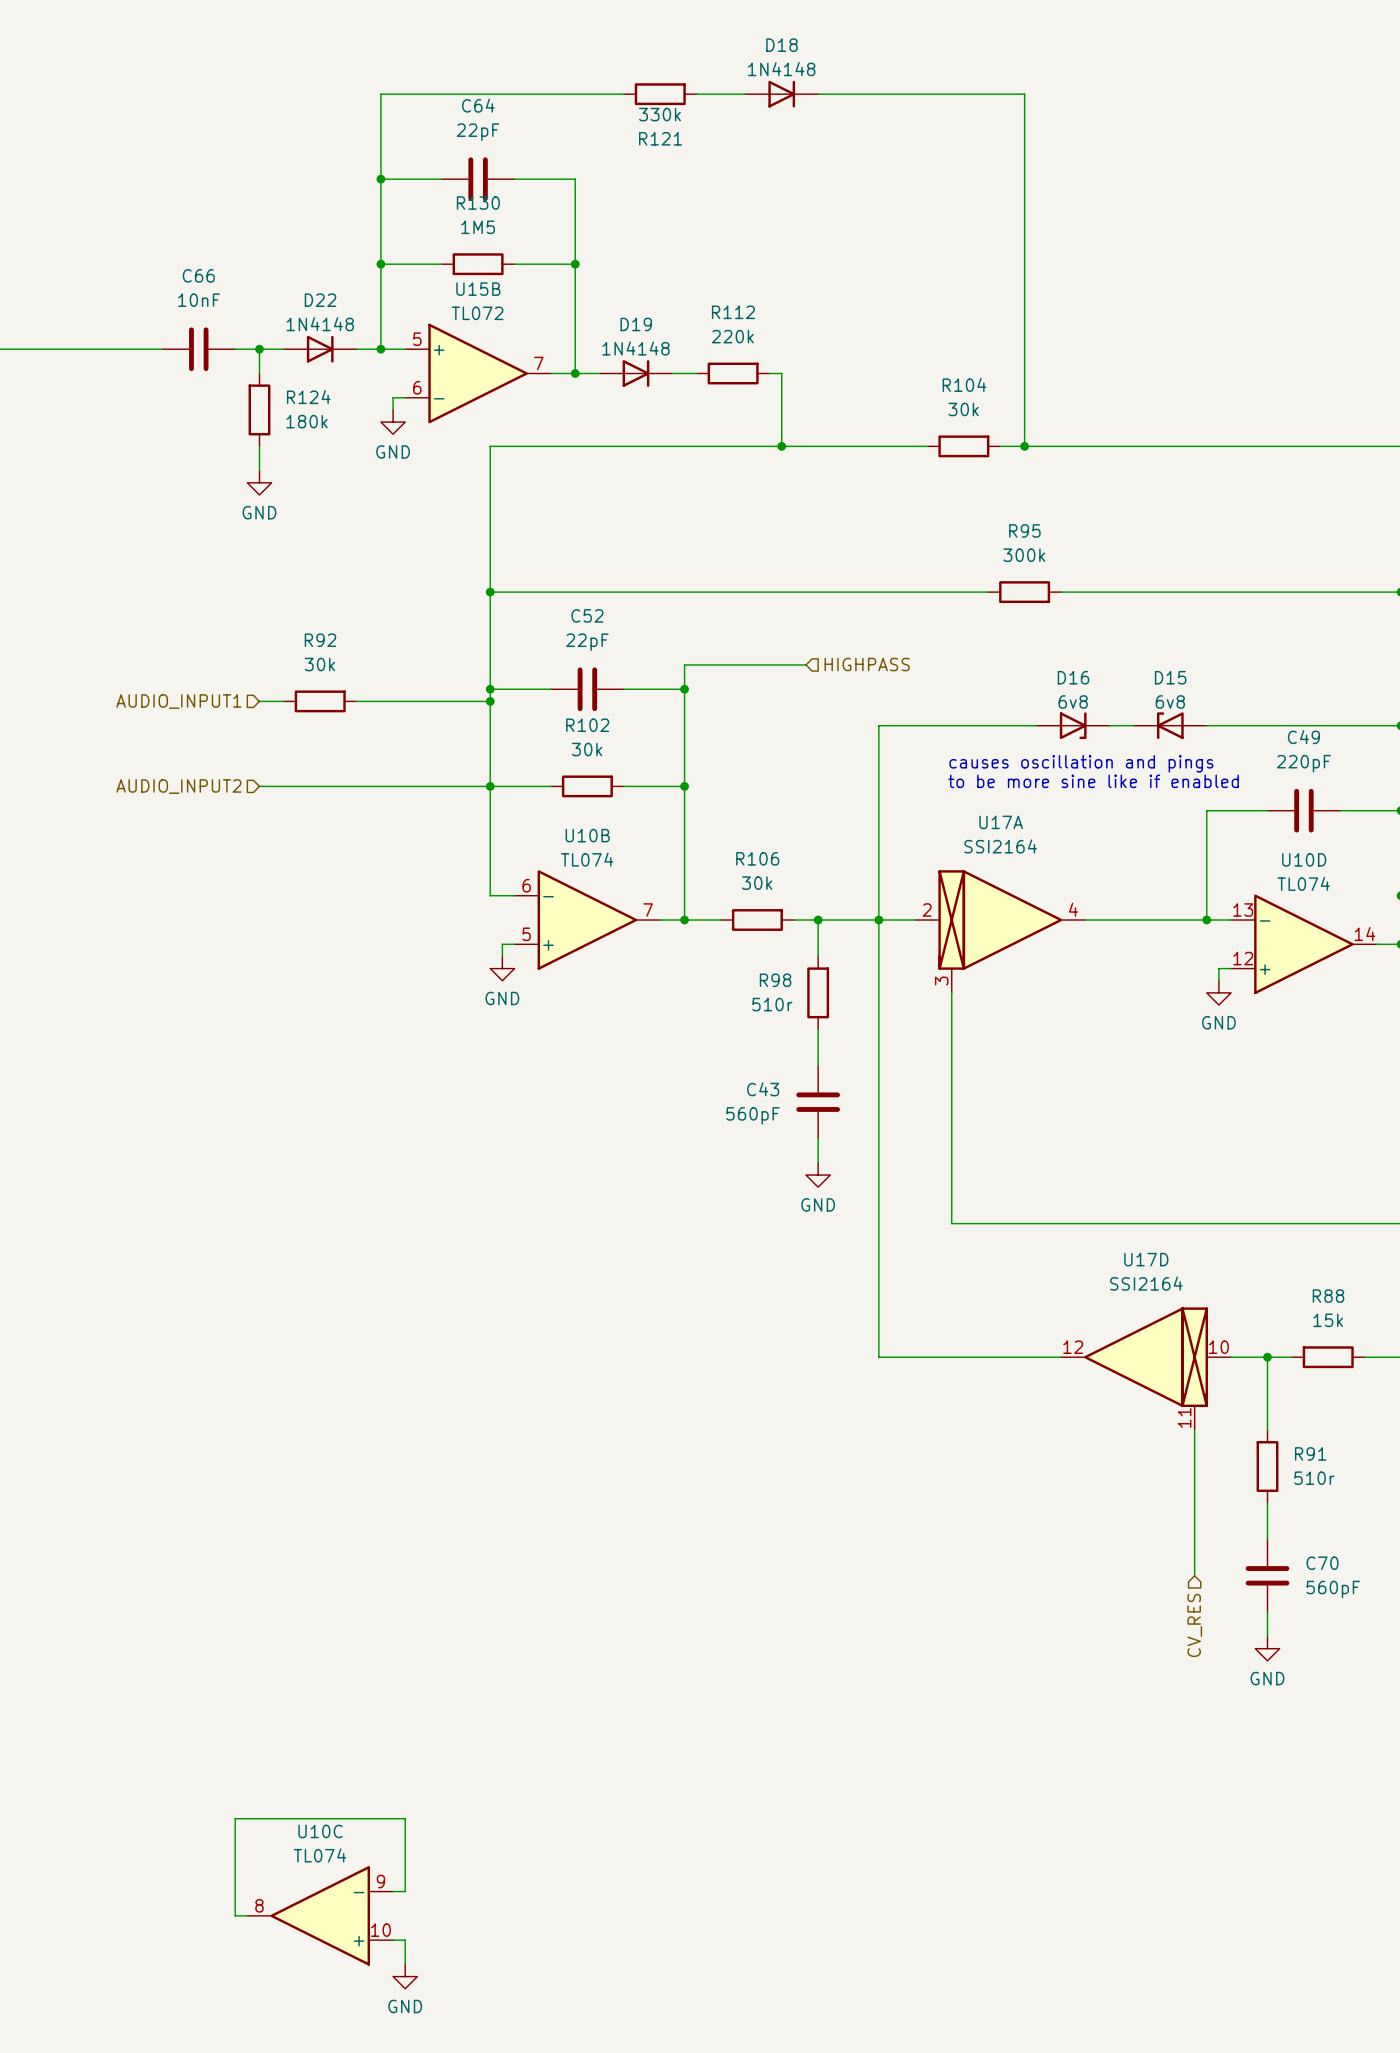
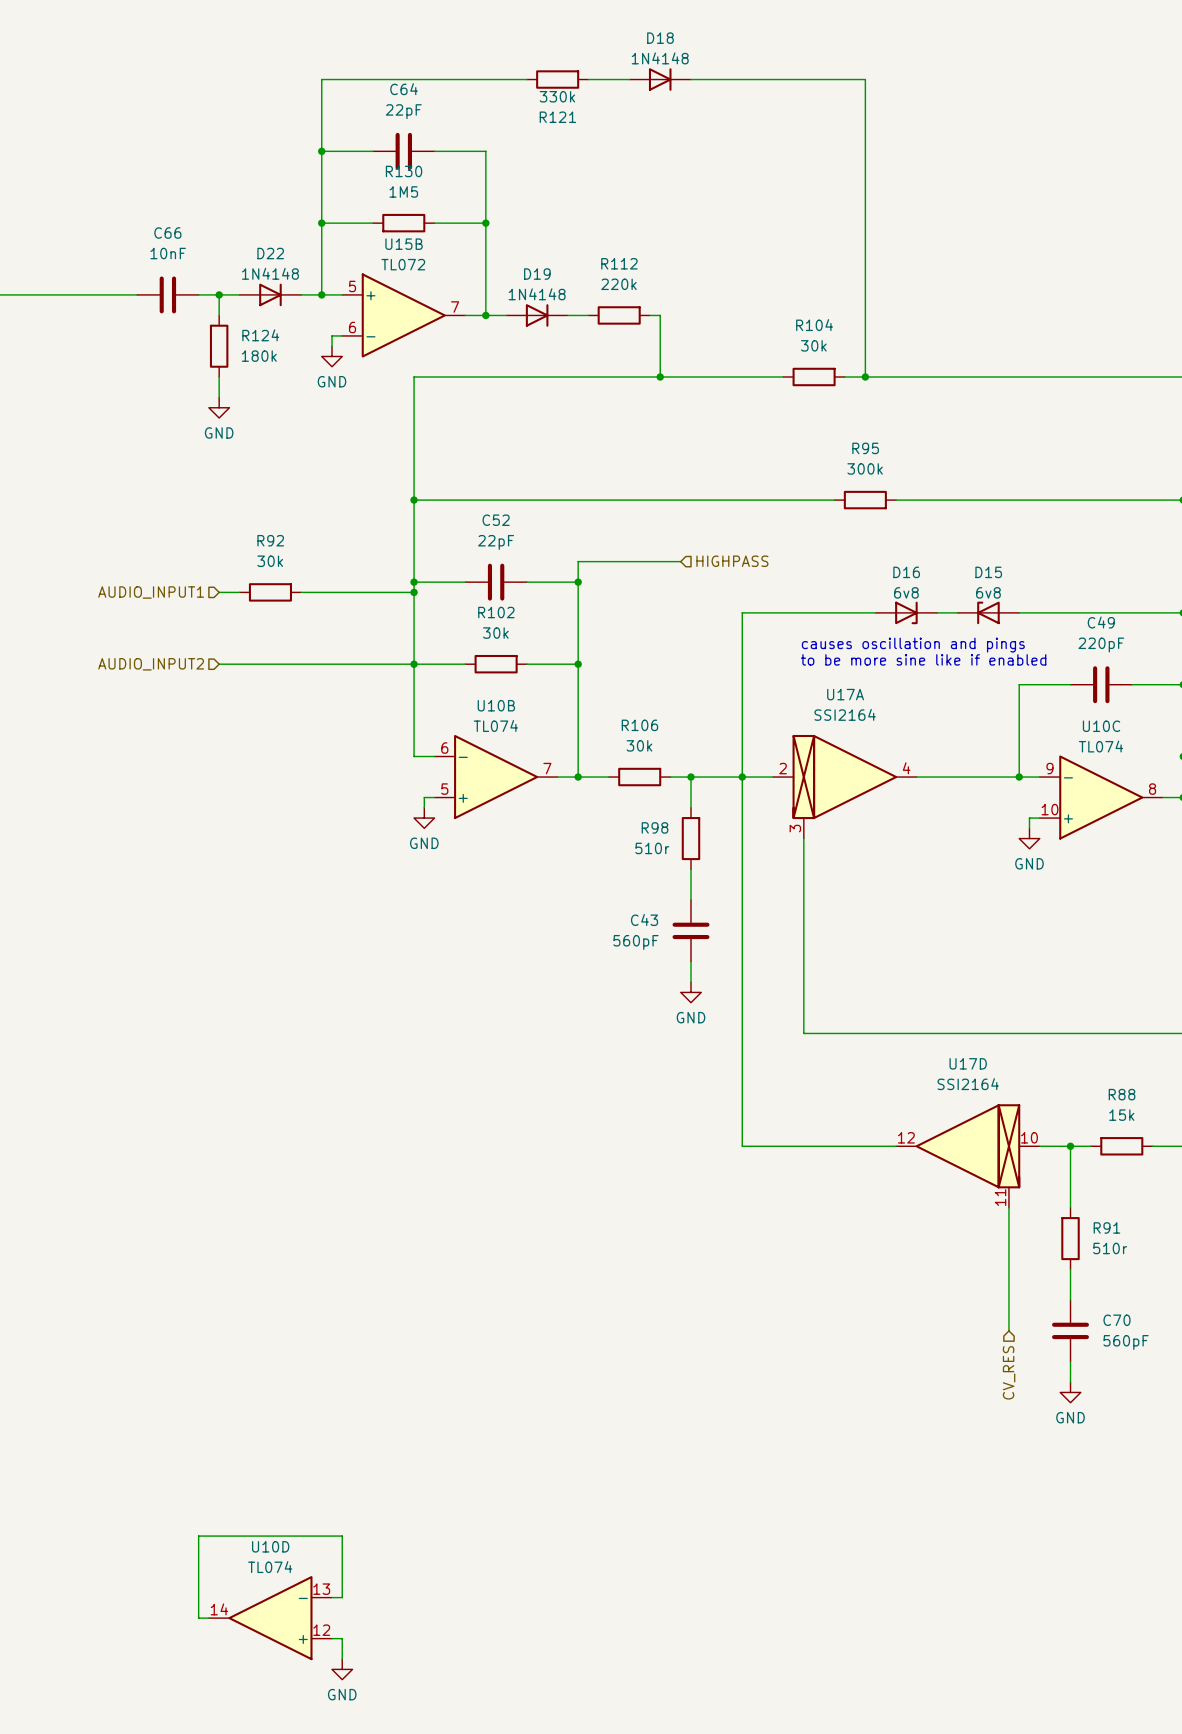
U10D flip: as is (1303, 944) -> left-right (270, 1618)
U10D position: (1303, 944) -> (270, 1618)
U10C flip: as is (320, 1915) -> left-right (1101, 797)
U10C position: (320, 1915) -> (1101, 797)

